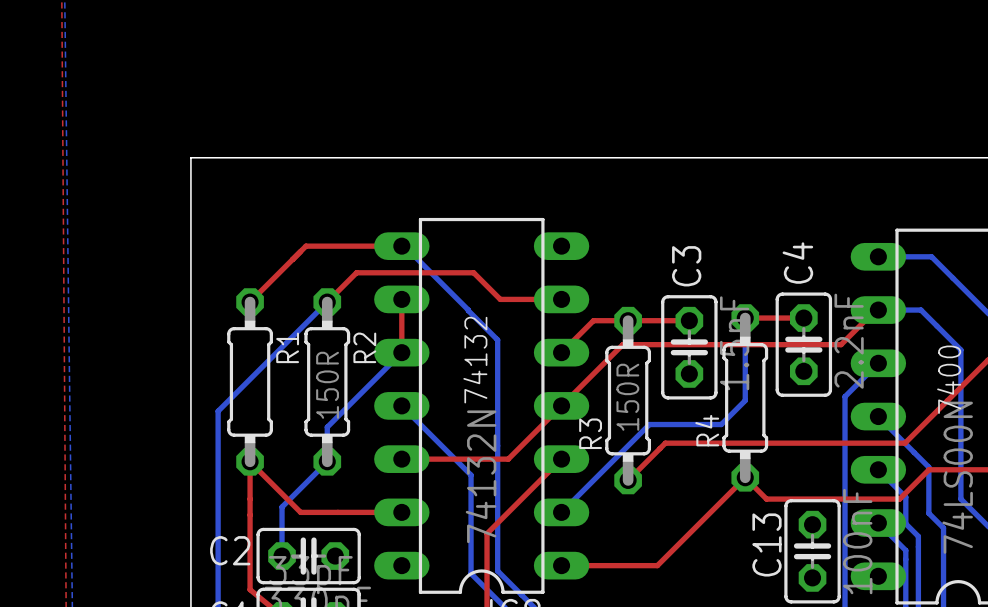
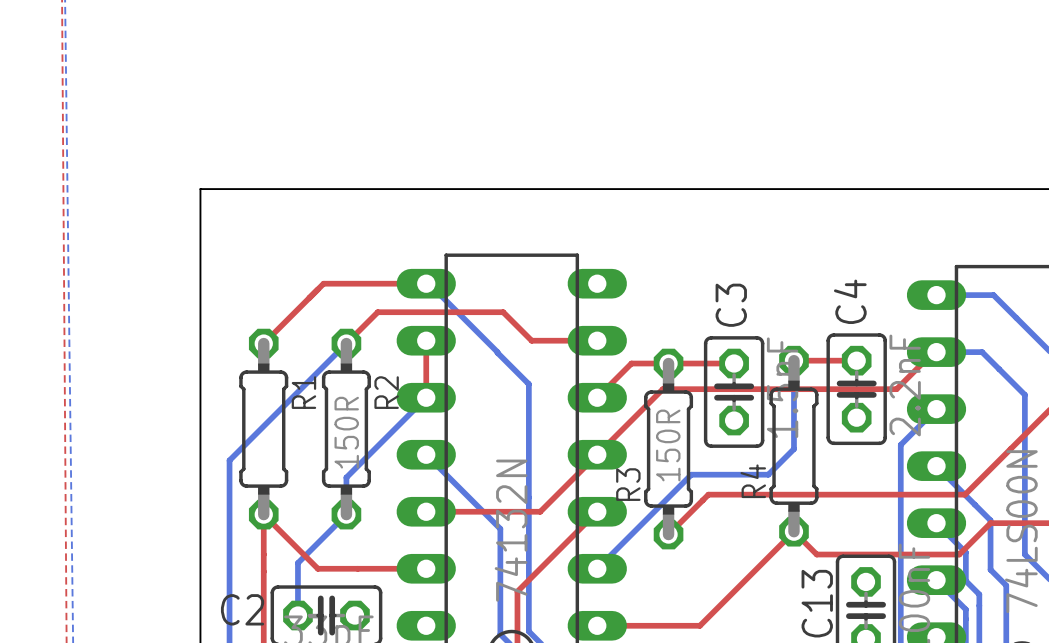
text: 74132 (475, 360) -> none
text: 7400 (949, 379) -> none

